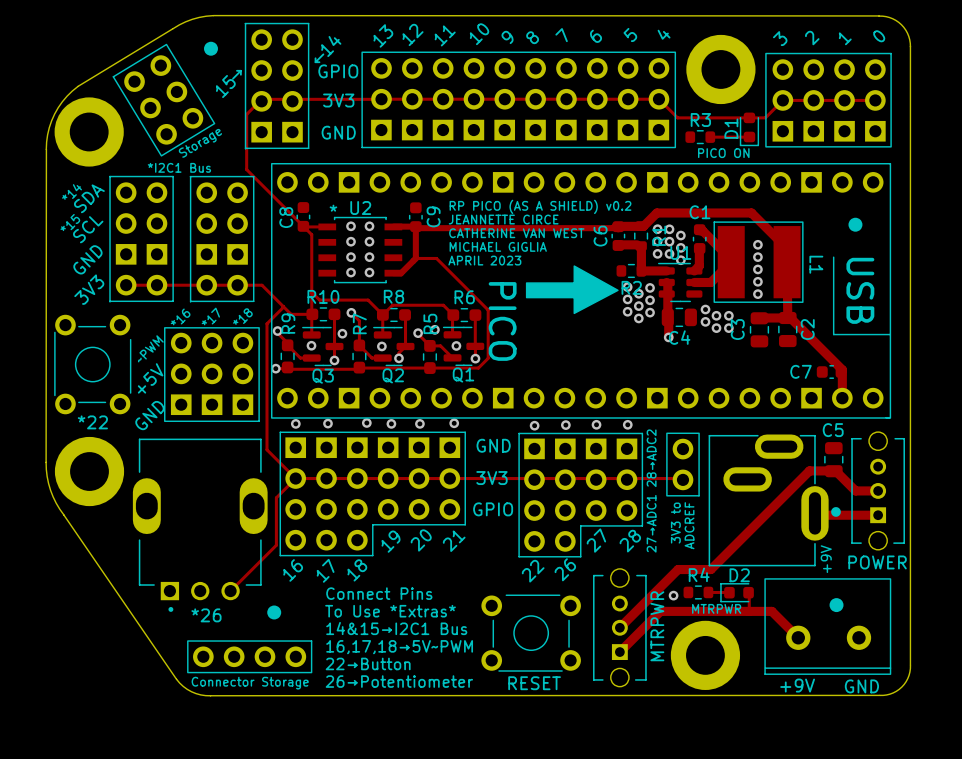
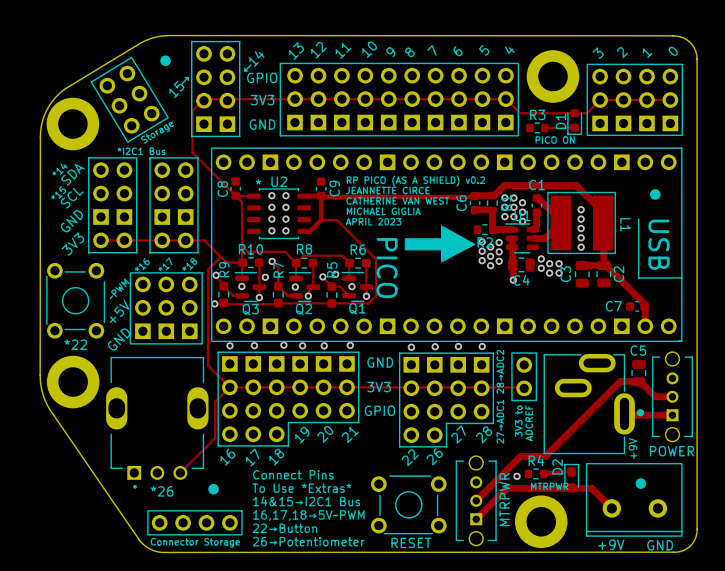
D2 footprint: [720, 583, 754, 603] -> [564, 463, 580, 493]
track: none -> (544, 471) (571, 471)
track: (748, 592) (749, 611) -> none

